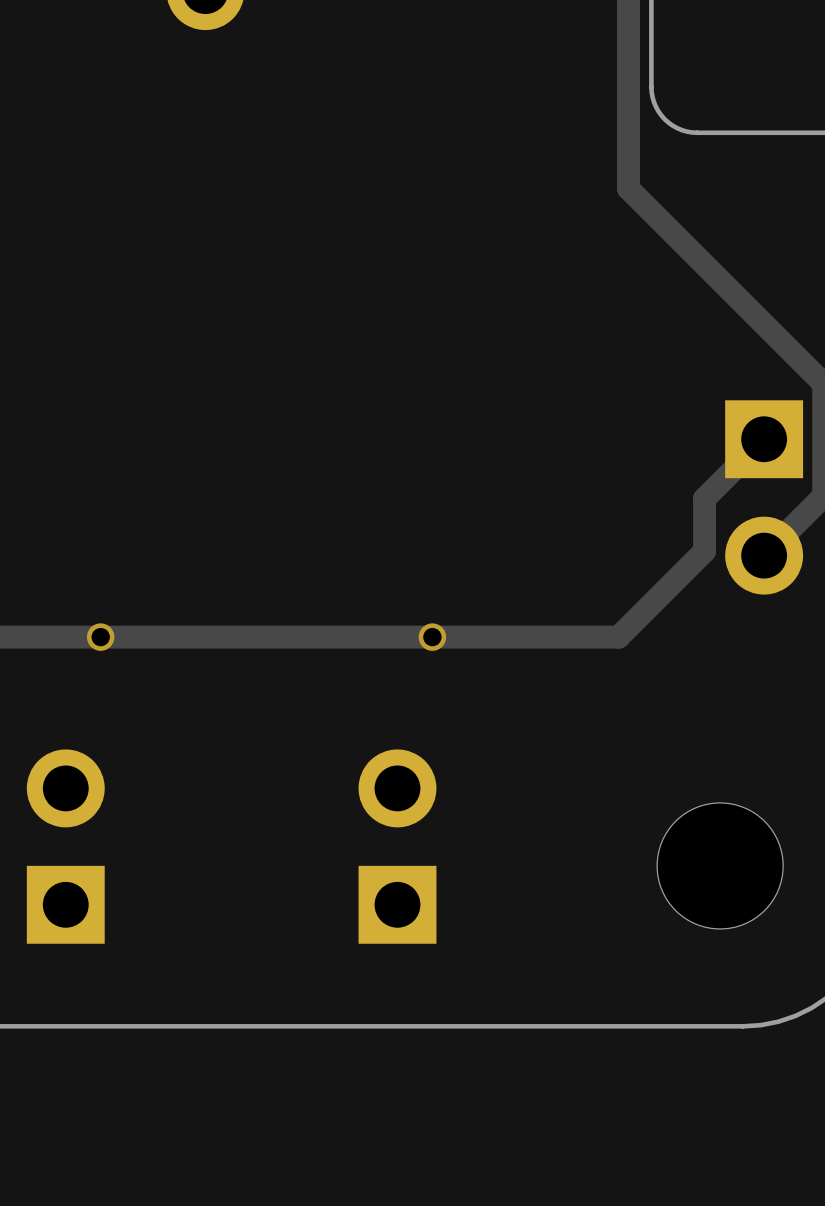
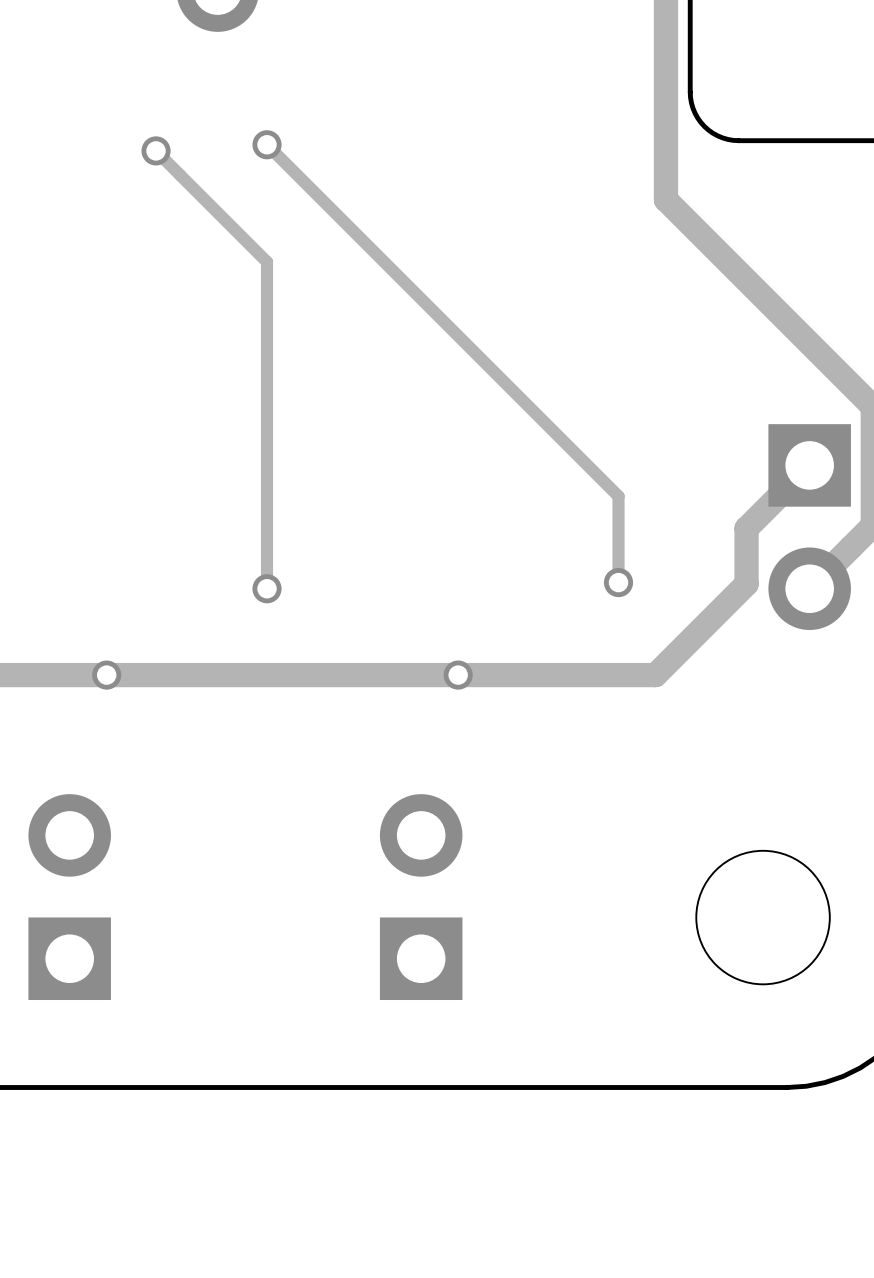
track: none -> (267, 144) (618, 496) (618, 582)
via: none -> (267, 144)
track: none -> (156, 150) (267, 261) (267, 588)
via: none -> (156, 150)
via: none -> (618, 582)
via: none -> (267, 588)

